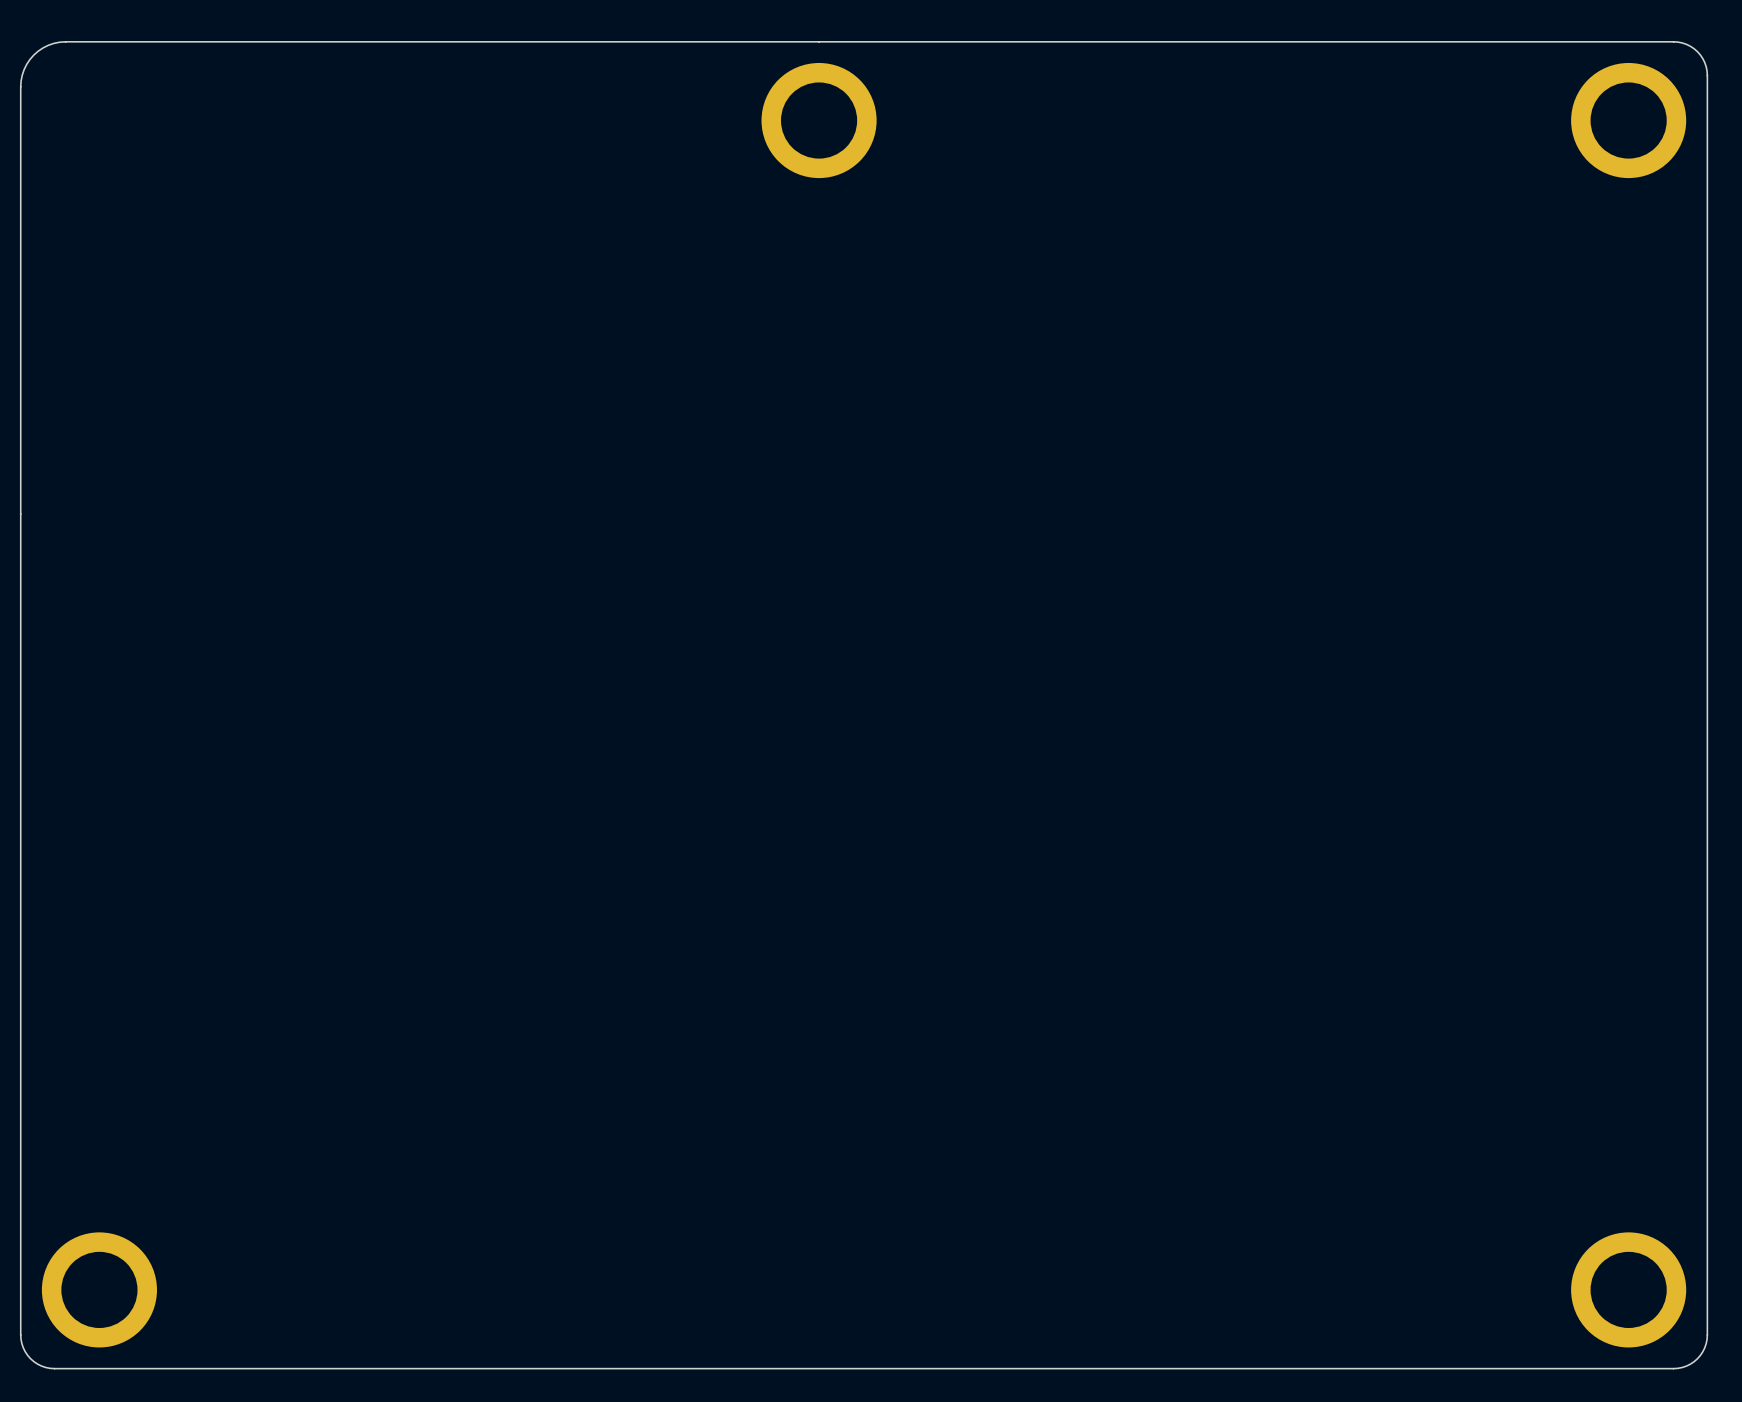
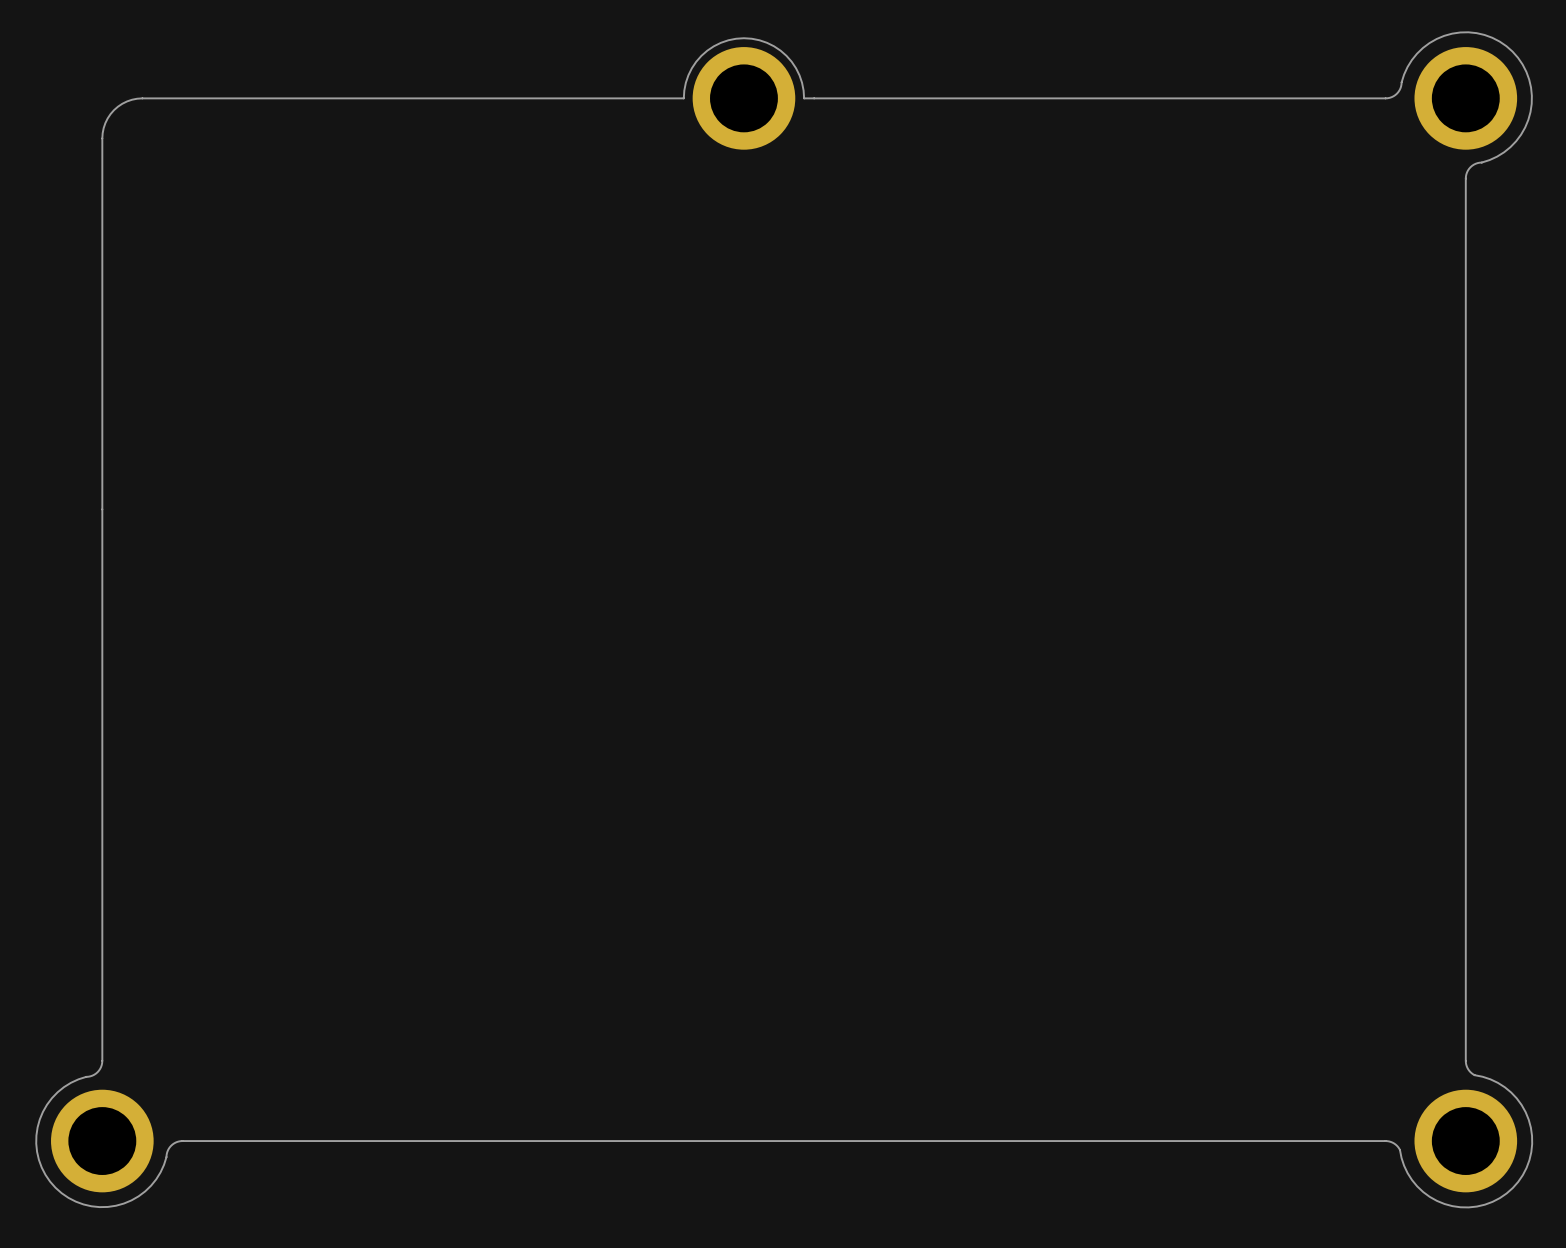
board edge: (65, 41) (1673, 41) (1686, 44) (1694, 48) (1702, 58) (1707, 75) (1707, 1334) (1706, 1343) (1700, 1355) (1690, 1364) (1673, 1368) (54, 1368) (45, 1367) (33, 1361) (23, 1347) (20, 1334) (20, 86) (24, 69) (33, 54) (48, 45) (65, 41) -> (1401, 82) (1396, 93) (1385, 98) (804, 98) (799, 75) (786, 55) (766, 42) (743, 38) (720, 42) (701, 55) (688, 75) (683, 98) (142, 98) (132, 99) (118, 106) (105, 123) (102, 138) (102, 1060) (101, 1066) (96, 1073) (78, 1079) (64, 1087) (51, 1098) (42, 1111) (37, 1127) (36, 1143) (41, 1167) (50, 1181) (61, 1193) (83, 1204) (107, 1206) (123, 1203) (138, 1196) (151, 1185) (160, 1172) (168, 1148) (173, 1143) (182, 1141) (1385, 1141) (1392, 1142) (1398, 1146) (1404, 1165) (1412, 1180) (1423, 1192) (1436, 1200) (1452, 1206) (1468, 1207) (1492, 1201) (1506, 1193) (1518, 1181) (1529, 1160) (1532, 1135) (1528, 1119) (1521, 1105) (1511, 1092) (1497, 1082) (1473, 1074) (1467, 1067) (1465, 1060) (1465, 178) (1467, 170) (1472, 165) (1497, 156) (1516, 141) (1528, 119) (1531, 95) (1526, 71) (1512, 51) (1492, 37) (1468, 32) (1452, 33) (1429, 43) (1411, 60) (1401, 82)

